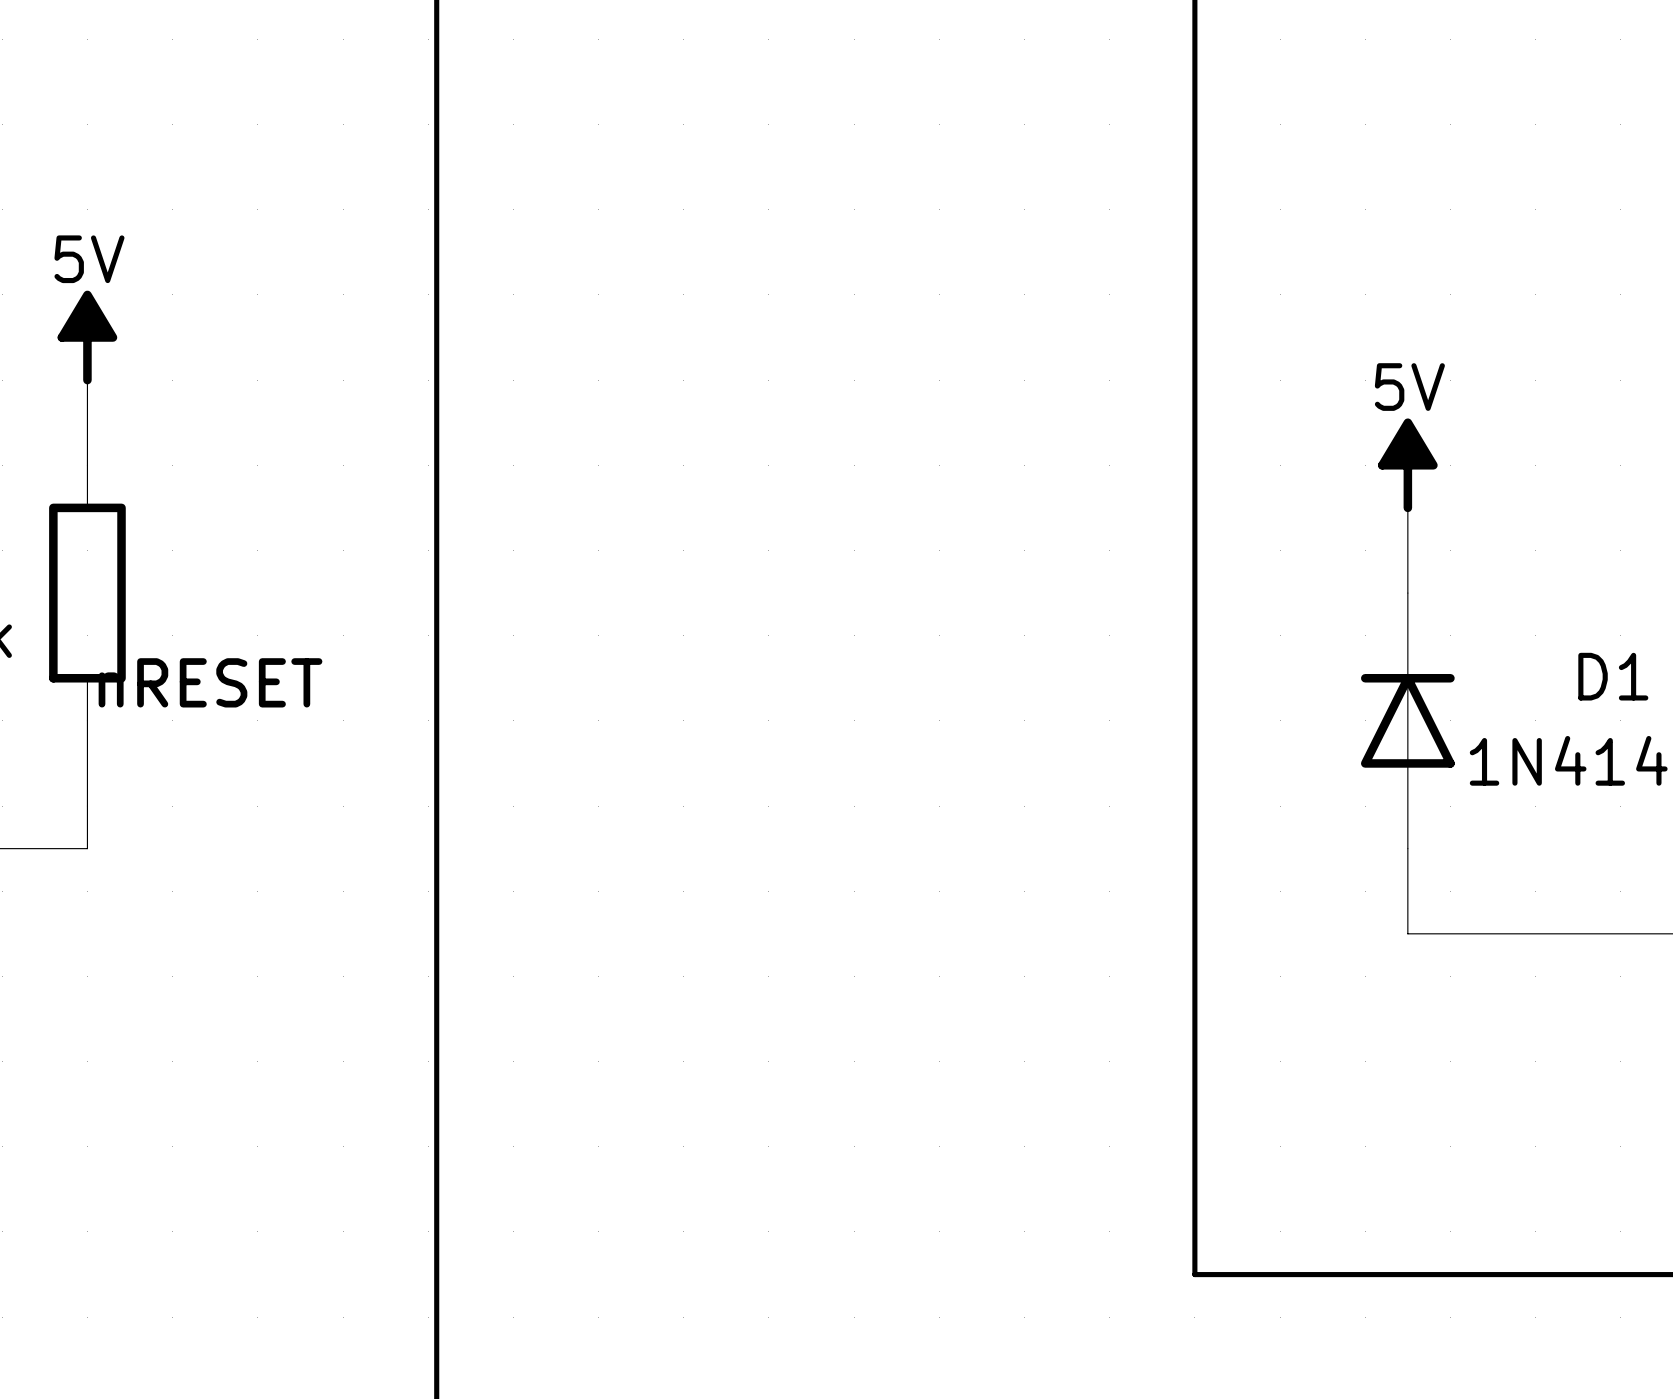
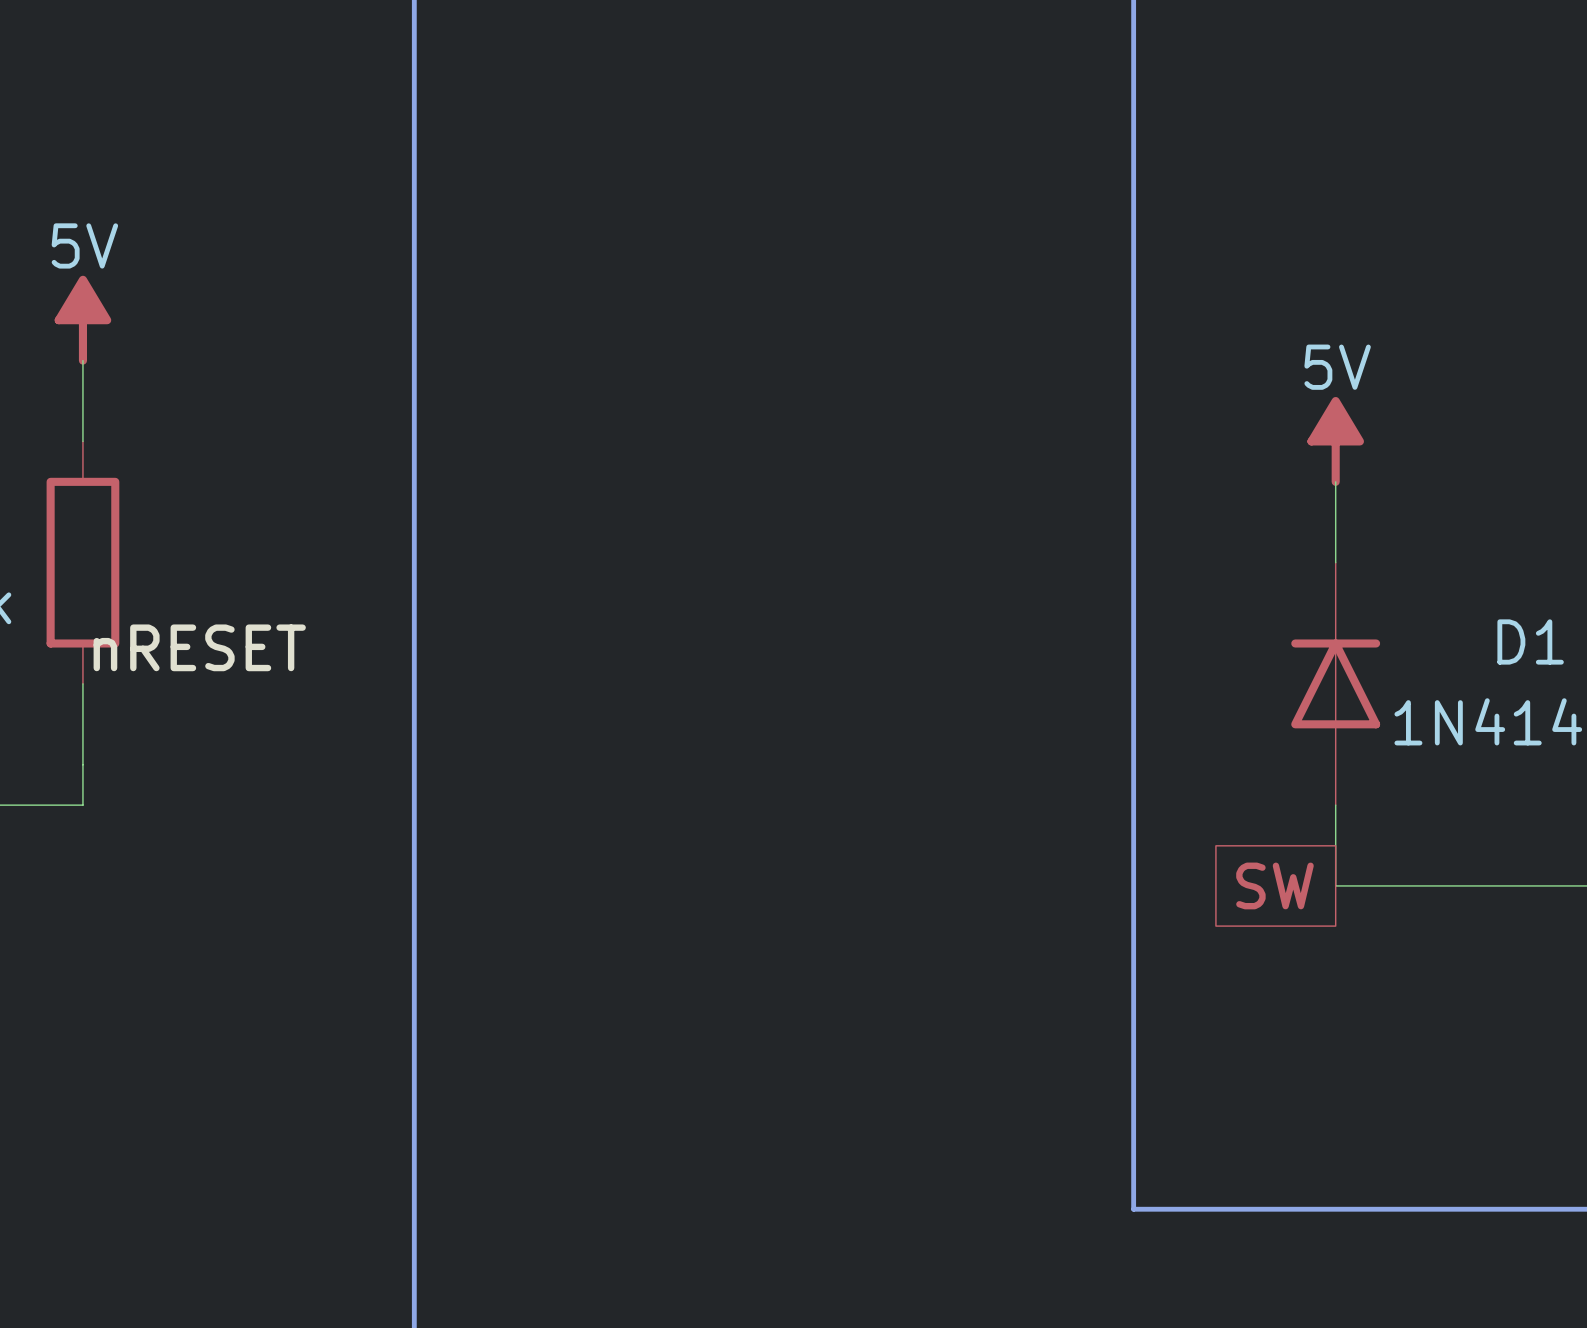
global label: none -> SW (1274, 885)

